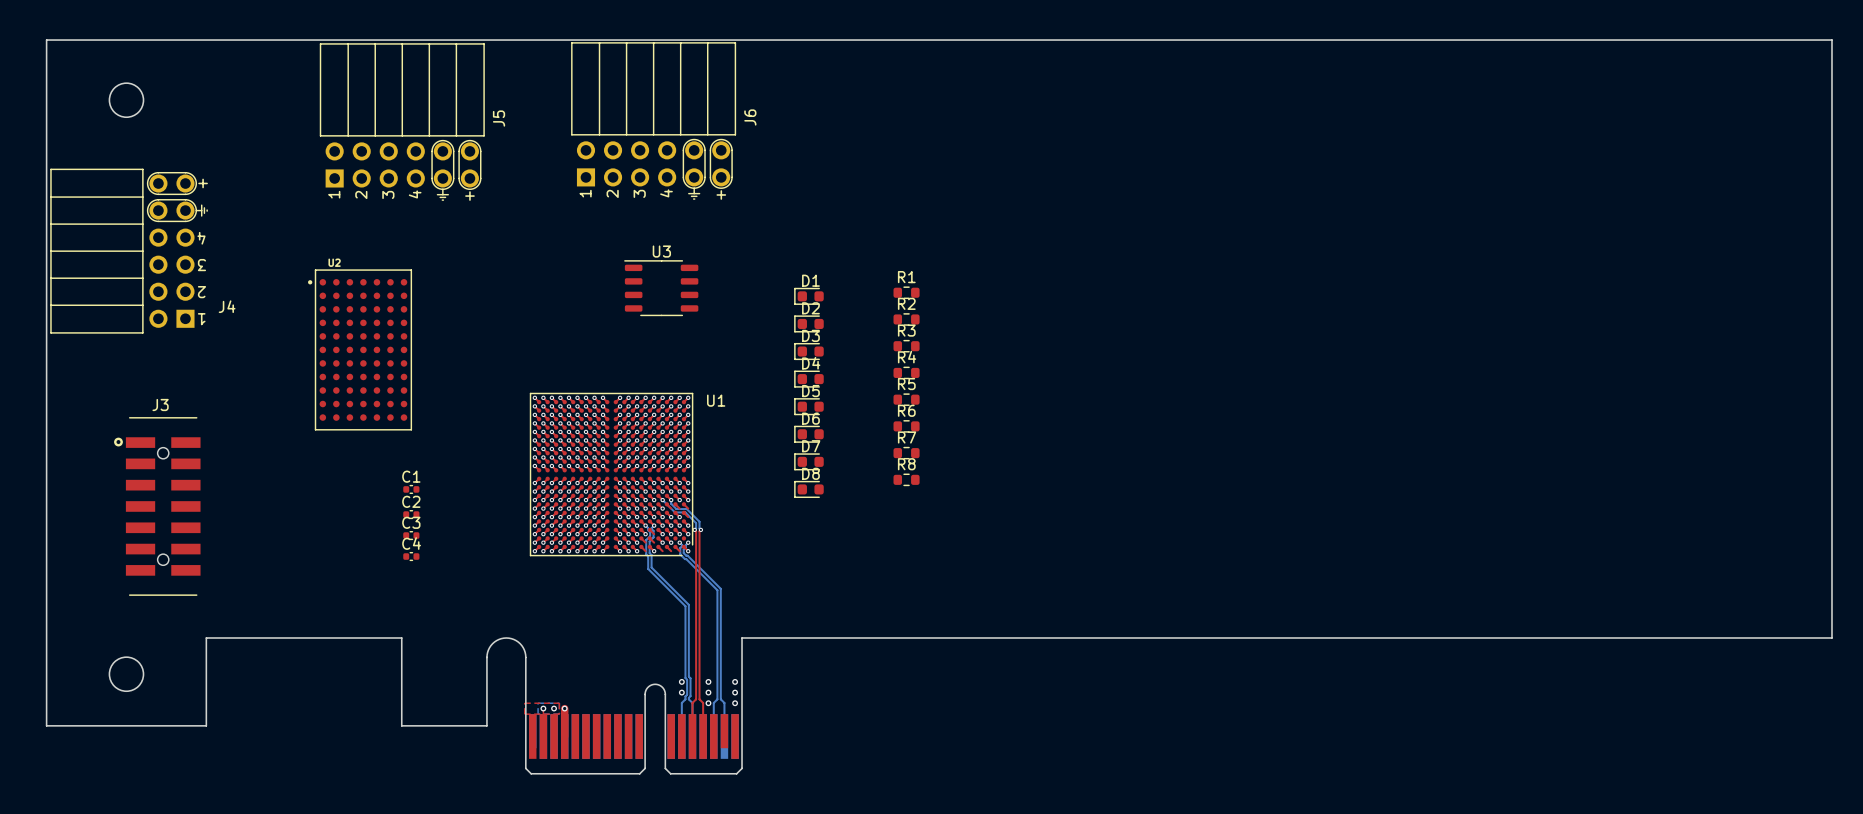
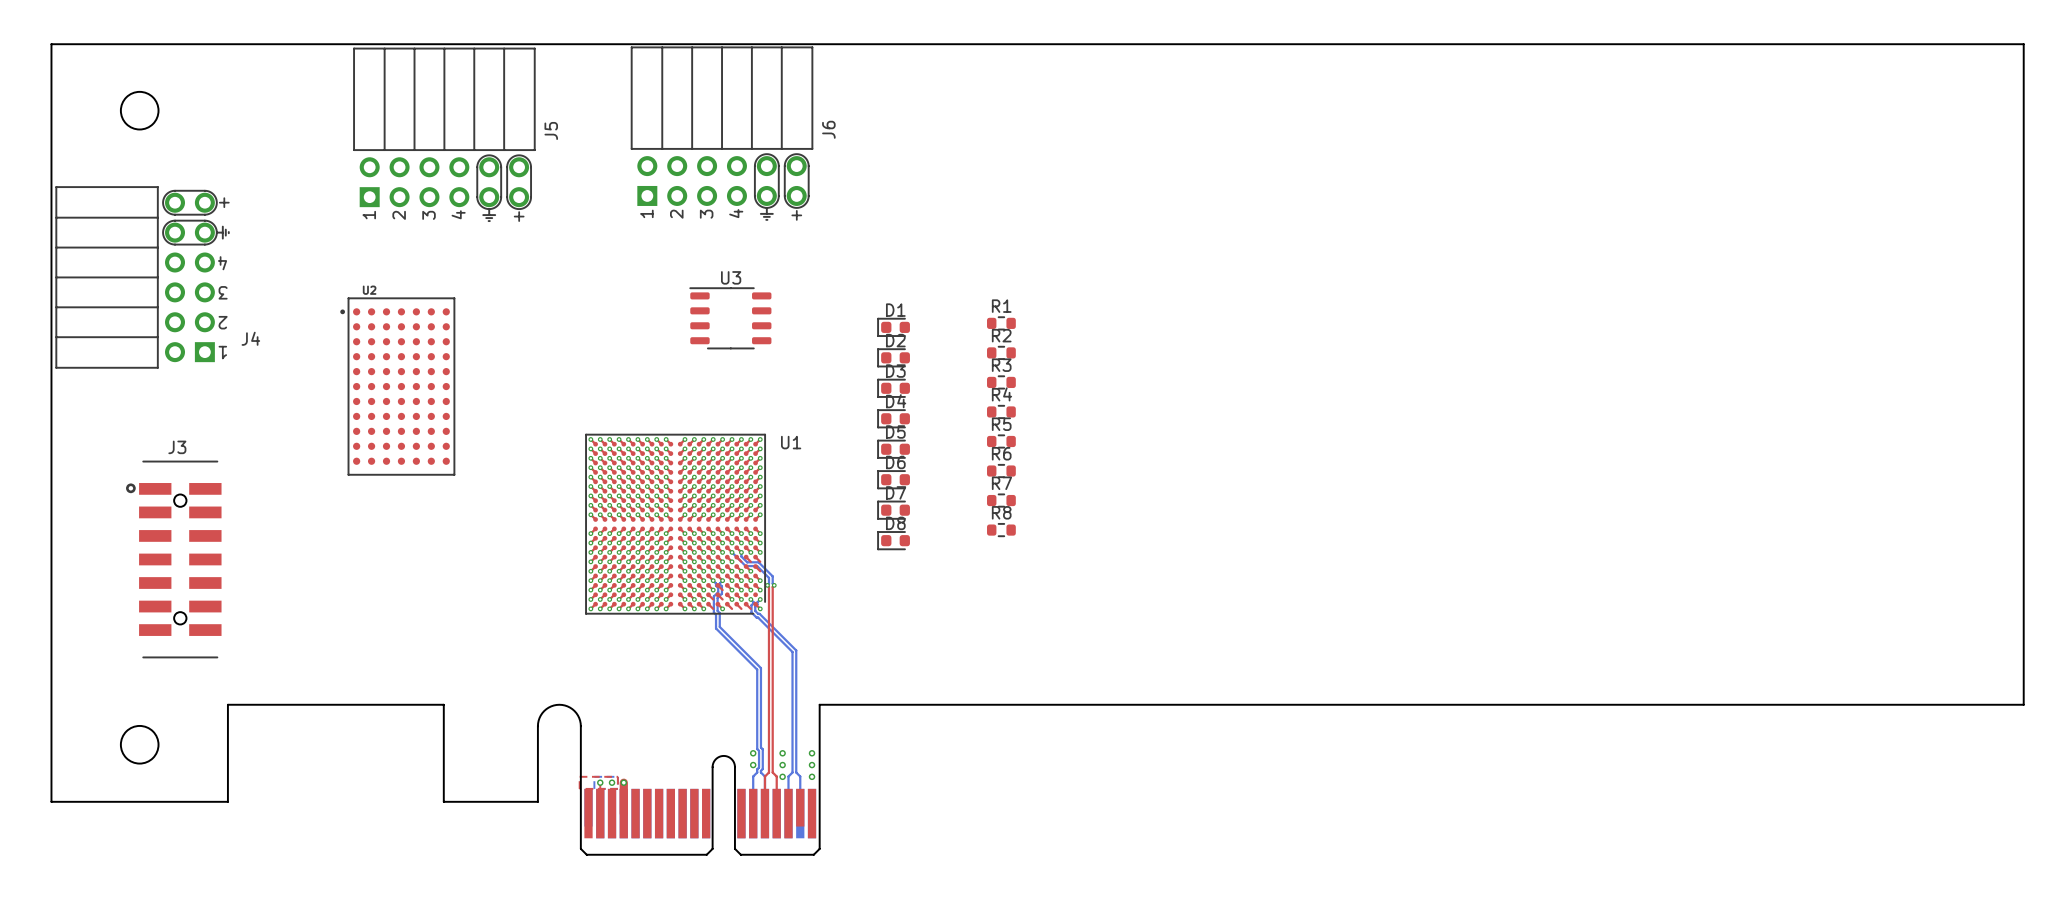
C1: (411, 489) -> none
C2: (411, 514) -> none
C3: (411, 535) -> none
C4: (411, 556) -> none

